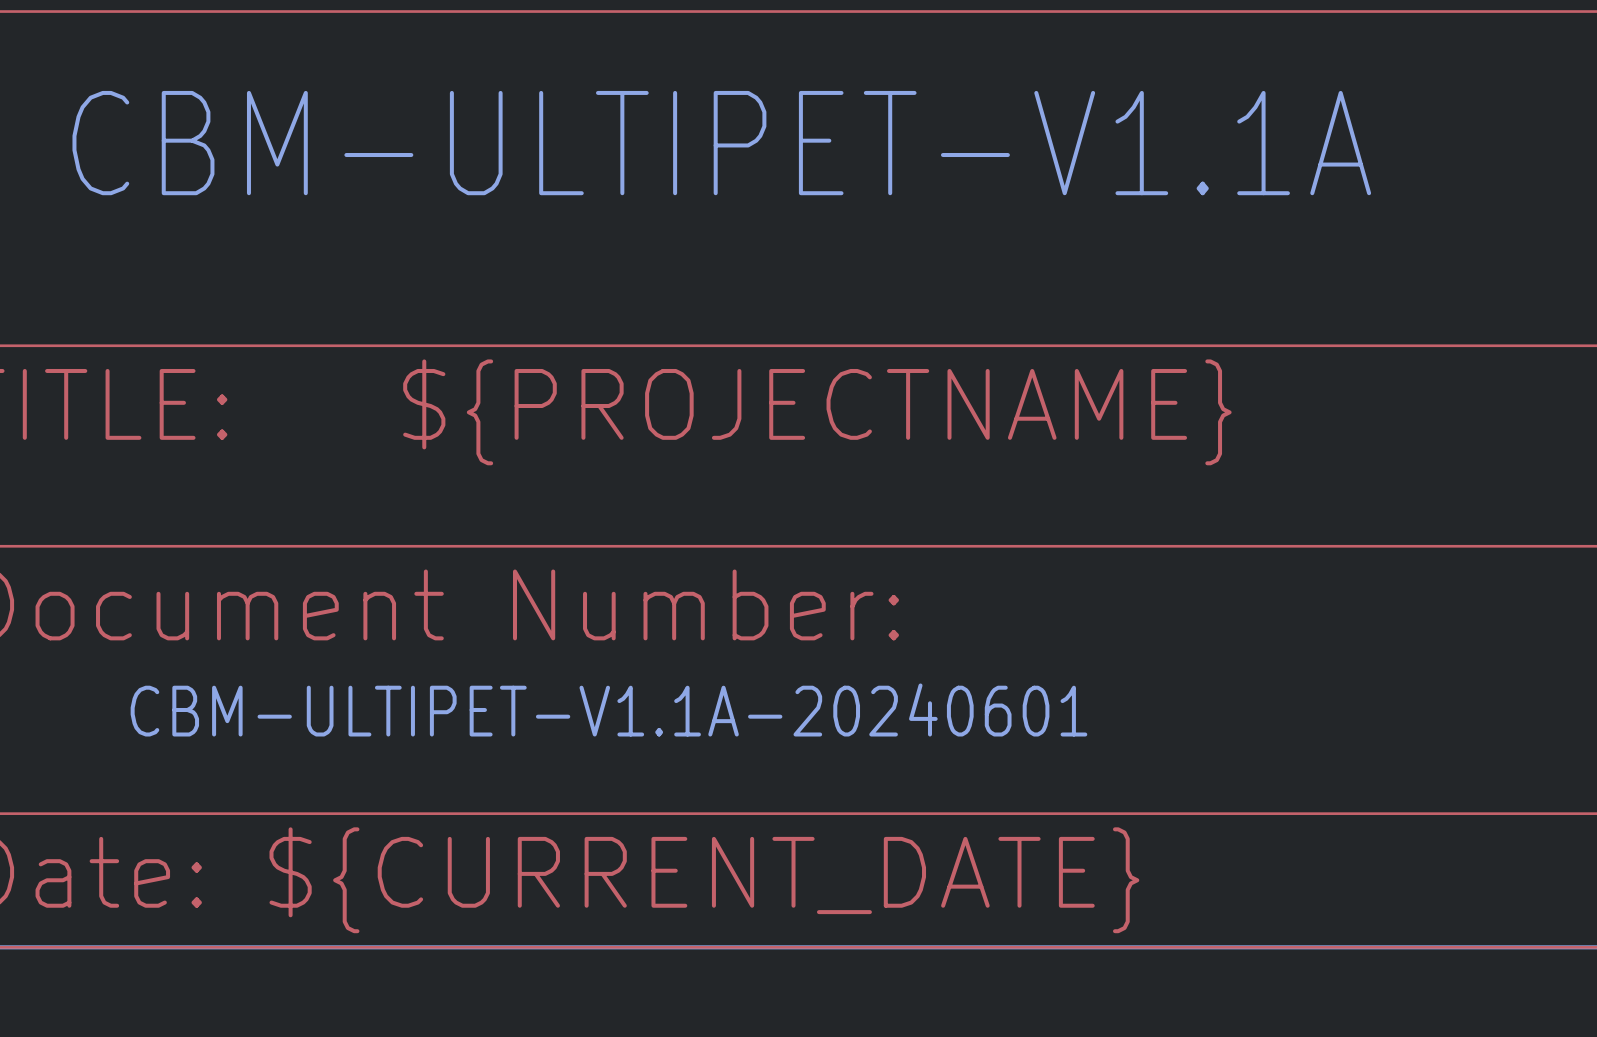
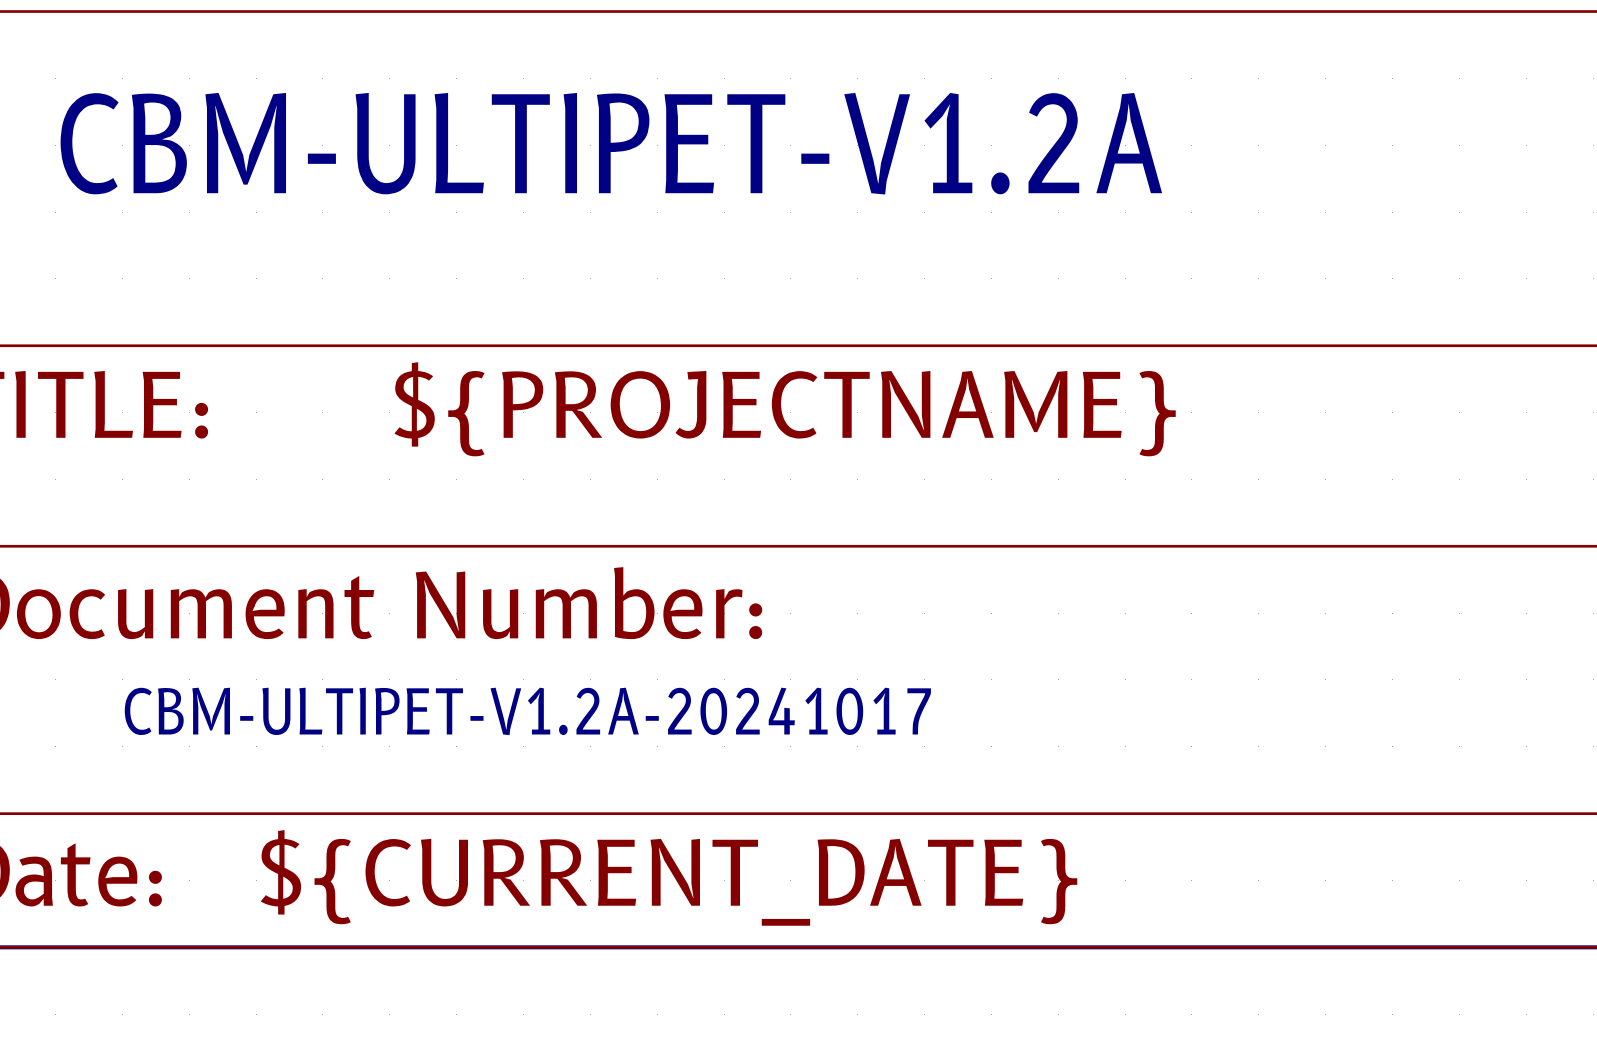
text: CBM-ULTIPET-V1.1A (721, 143) -> CBM-ULTIPET-V1.2A (611, 143)
text: CBM-ULTIPET-V1.1A-20240601 (608, 709) -> CBM-ULTIPET-V1.2A-20241017 (527, 711)

